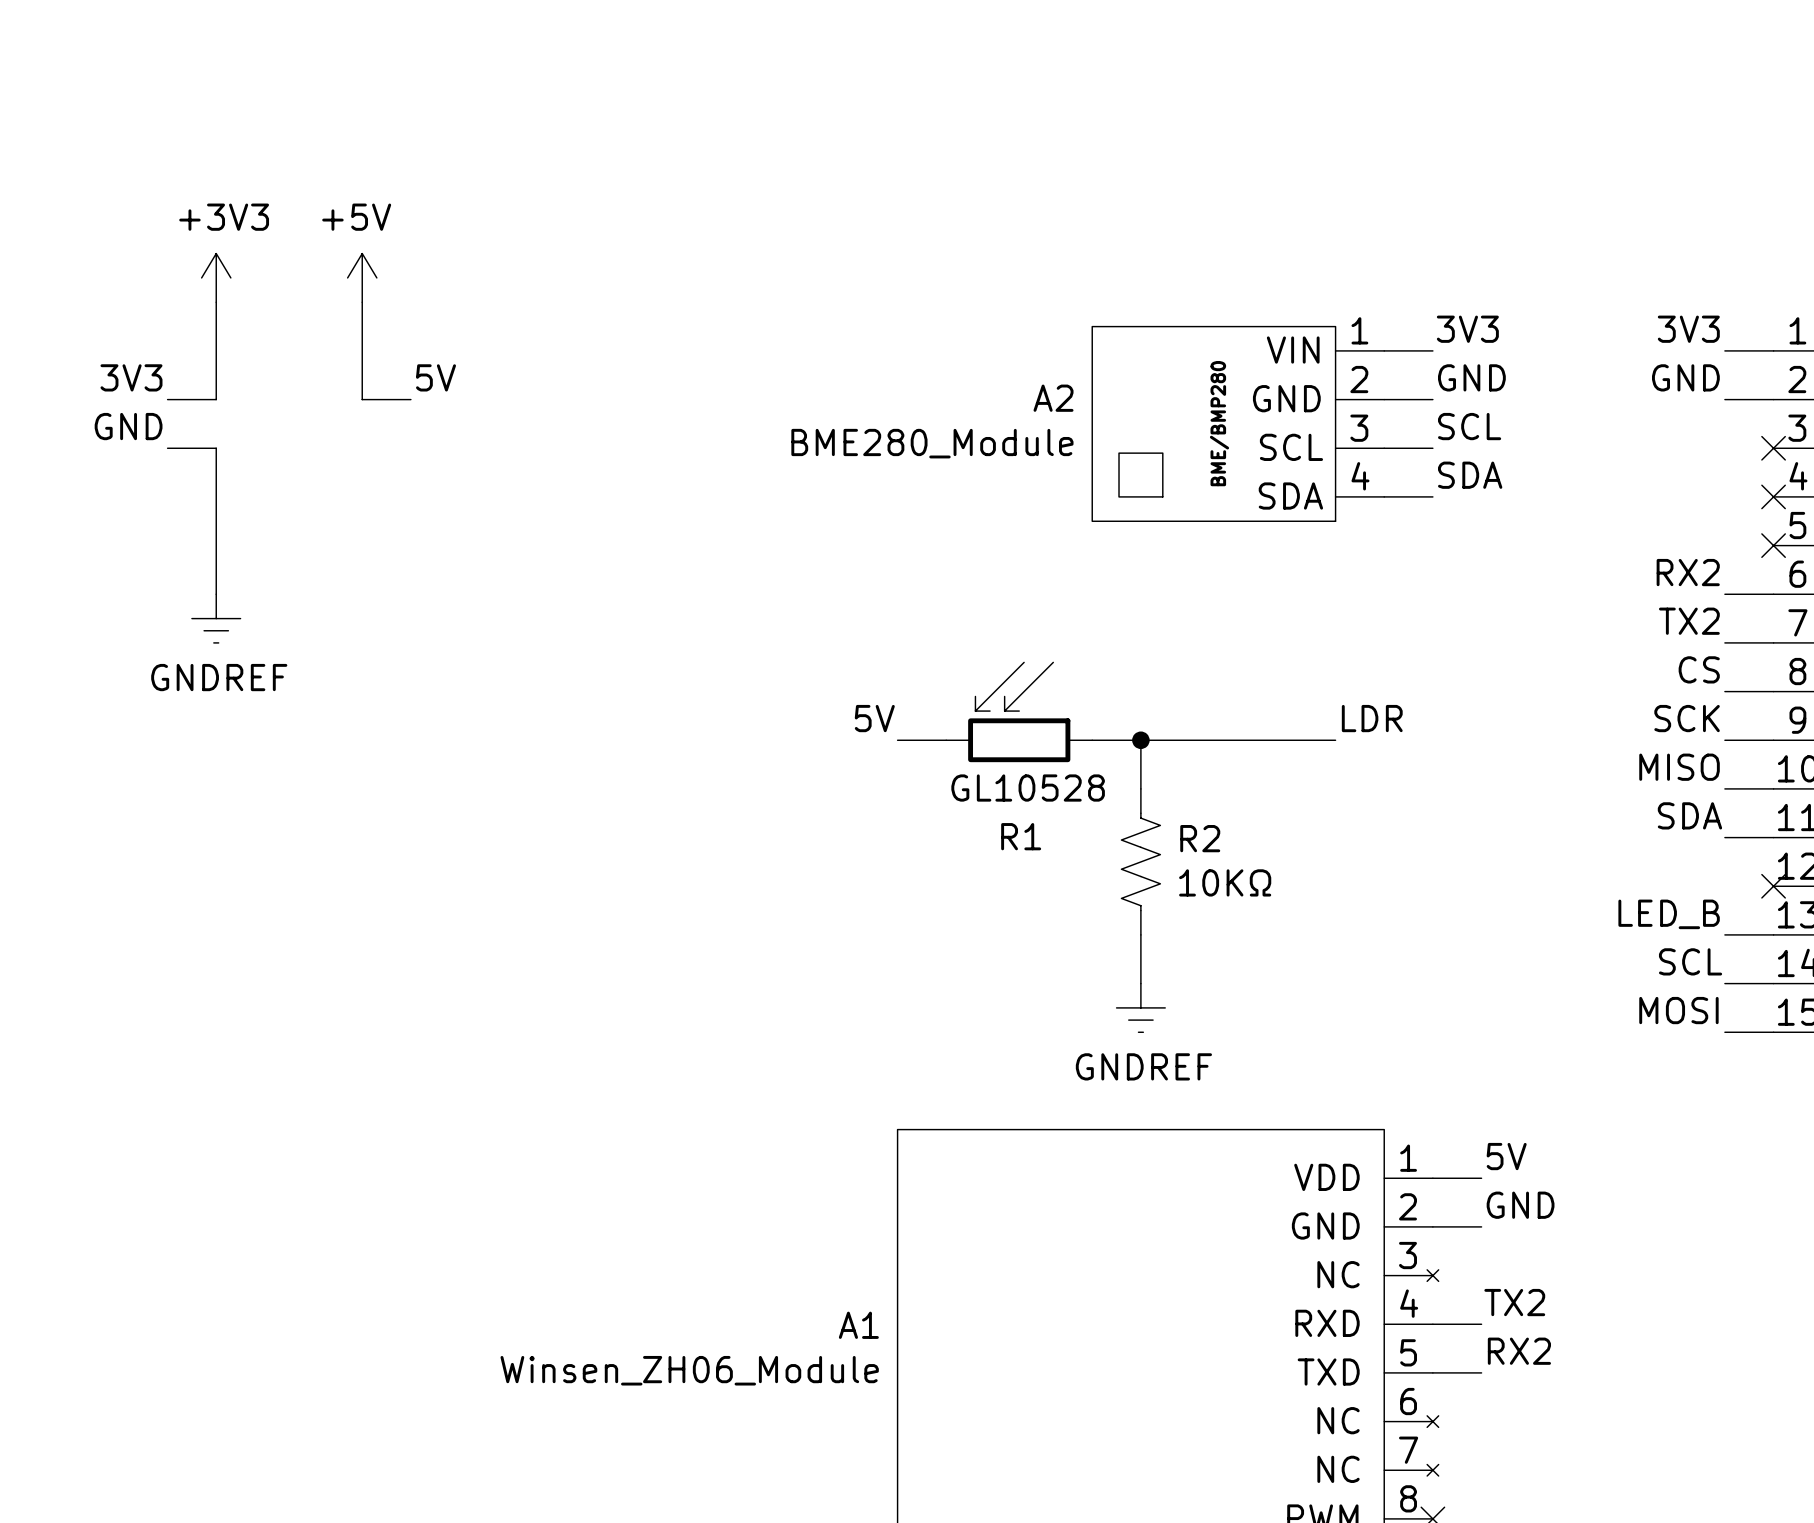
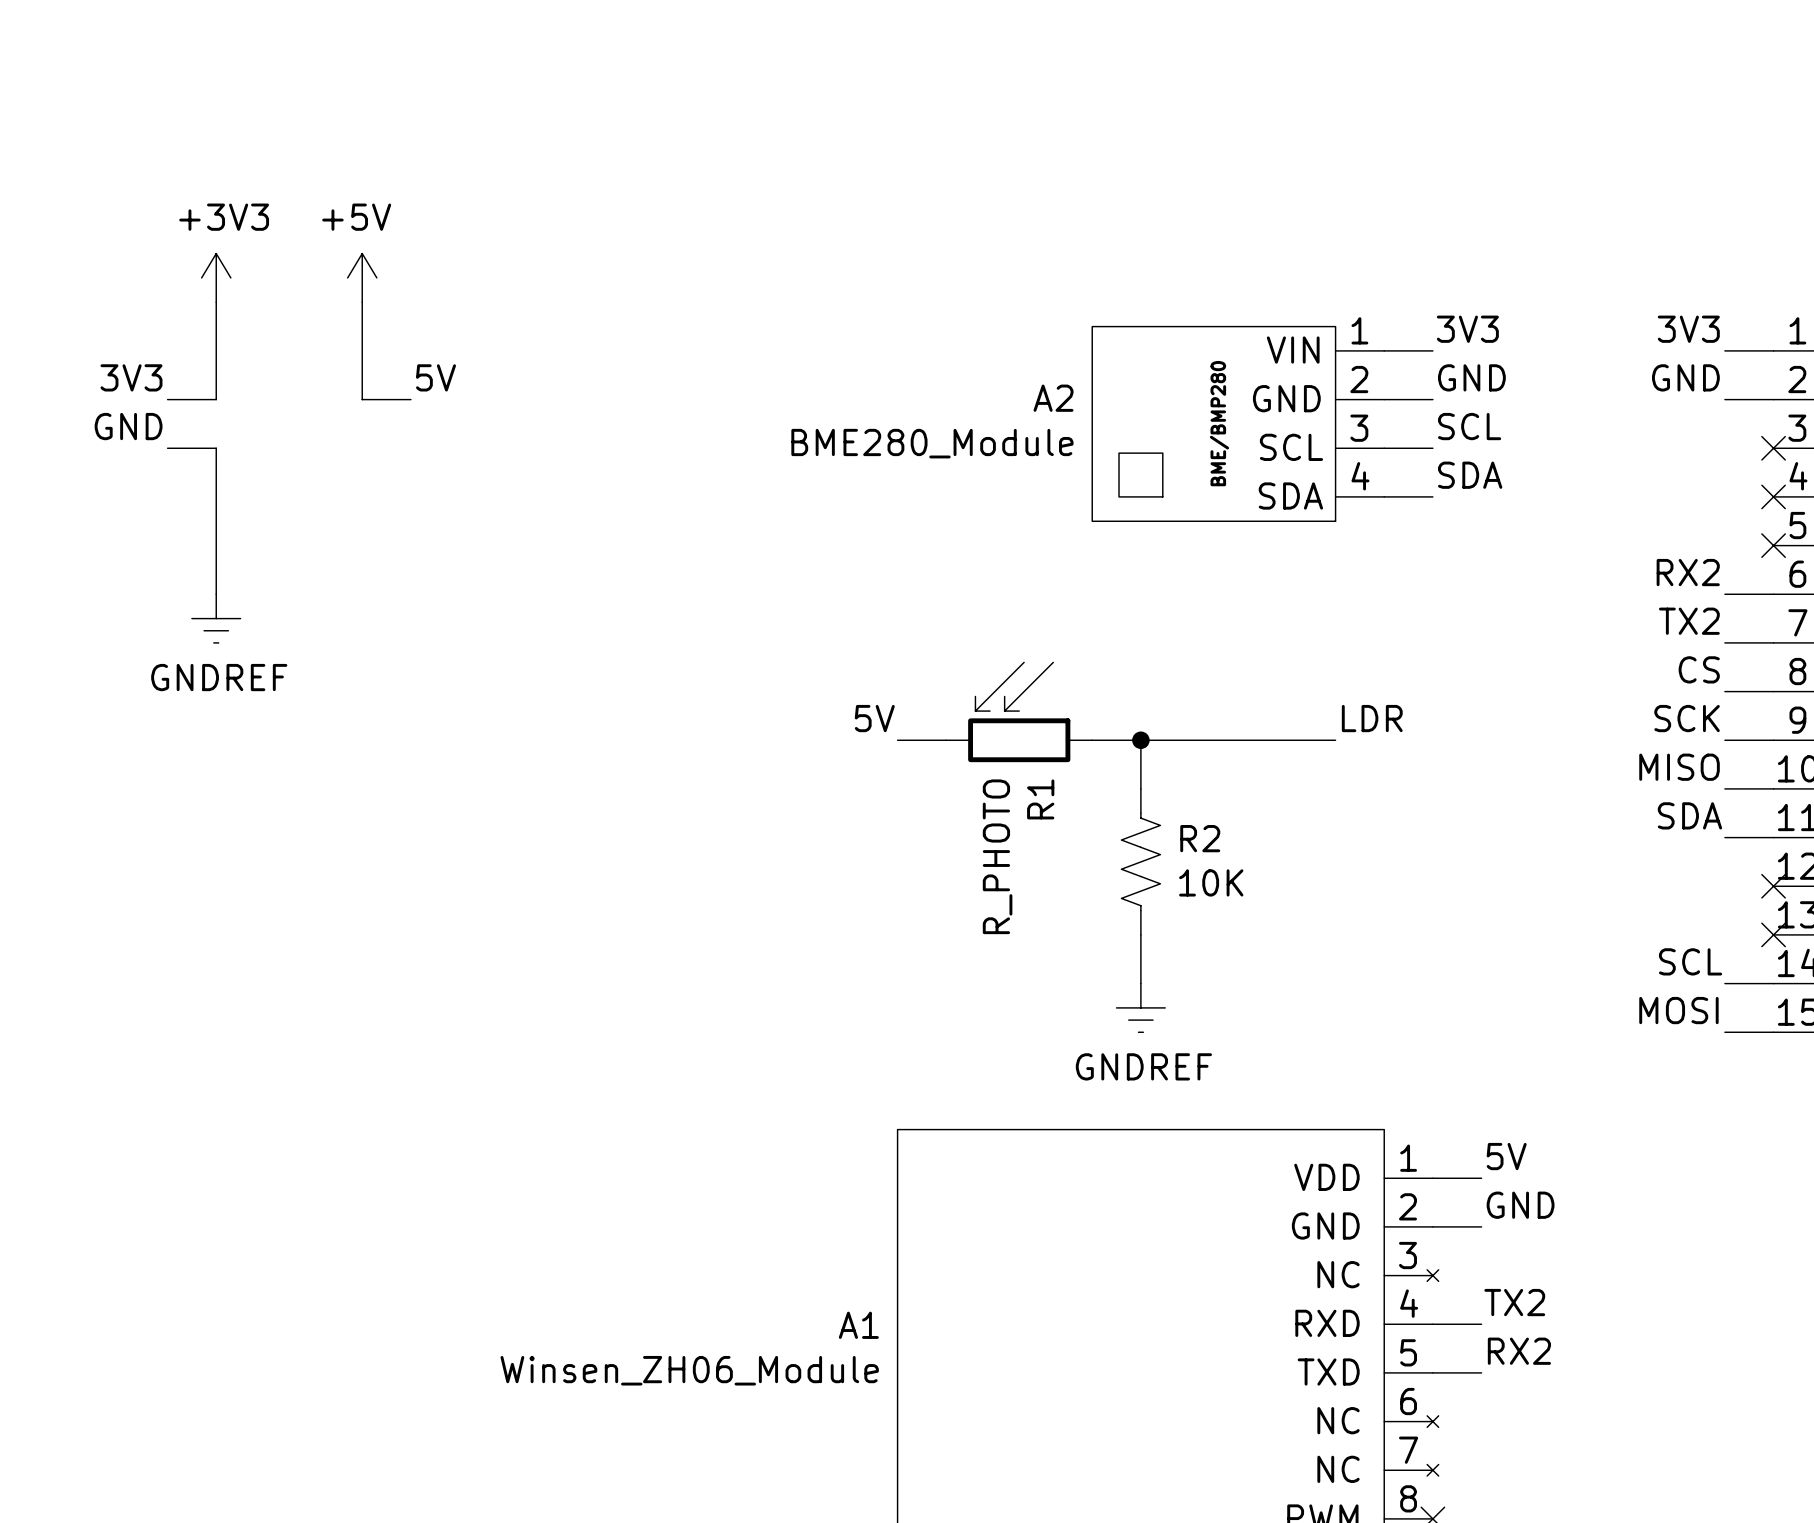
R1 value: GL10528 (1028, 788) -> R_PHOTO (997, 856)
R1 name rotation: 0° (1021, 836) -> 90° counterclockwise (1040, 799)
R2 value: 10KΩ (1225, 882) -> 10K (1211, 882)
label: LED_B (1669, 914) -> none
wire: (1724, 934) (1773, 934) -> none
no-connect mark: none -> (1773, 934)

